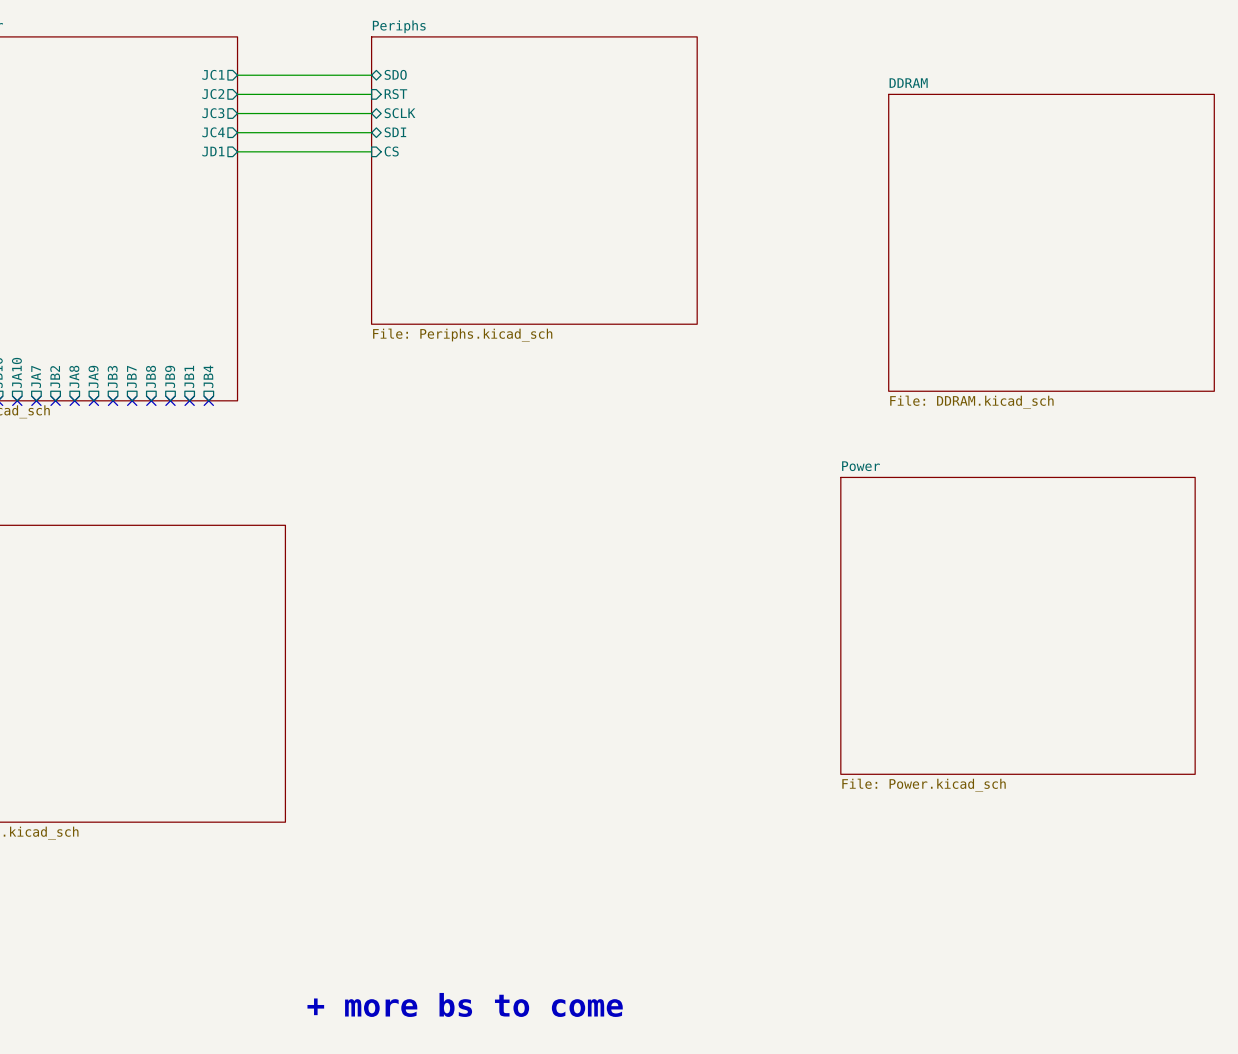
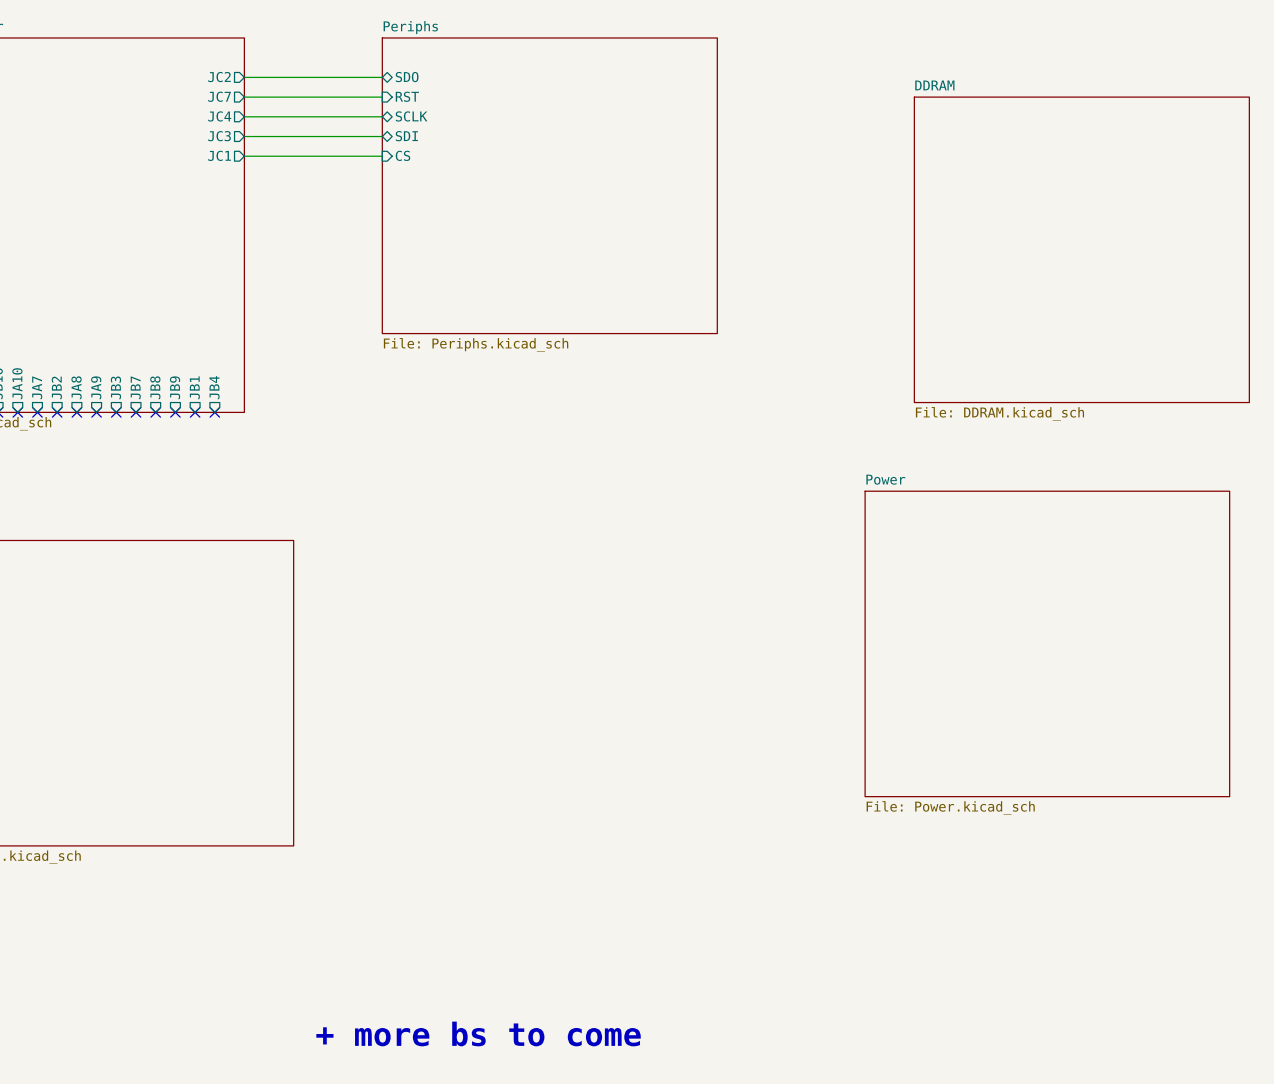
sheet pin: JC1 (213, 74) -> JC2 (219, 77)
sheet pin: JC2 (213, 94) -> JC7 (219, 96)
sheet pin: JC3 (213, 113) -> JC4 (219, 116)
sheet pin: JC4 (213, 132) -> JC3 (219, 136)
sheet pin: JD1 (213, 151) -> JC1 (219, 155)

